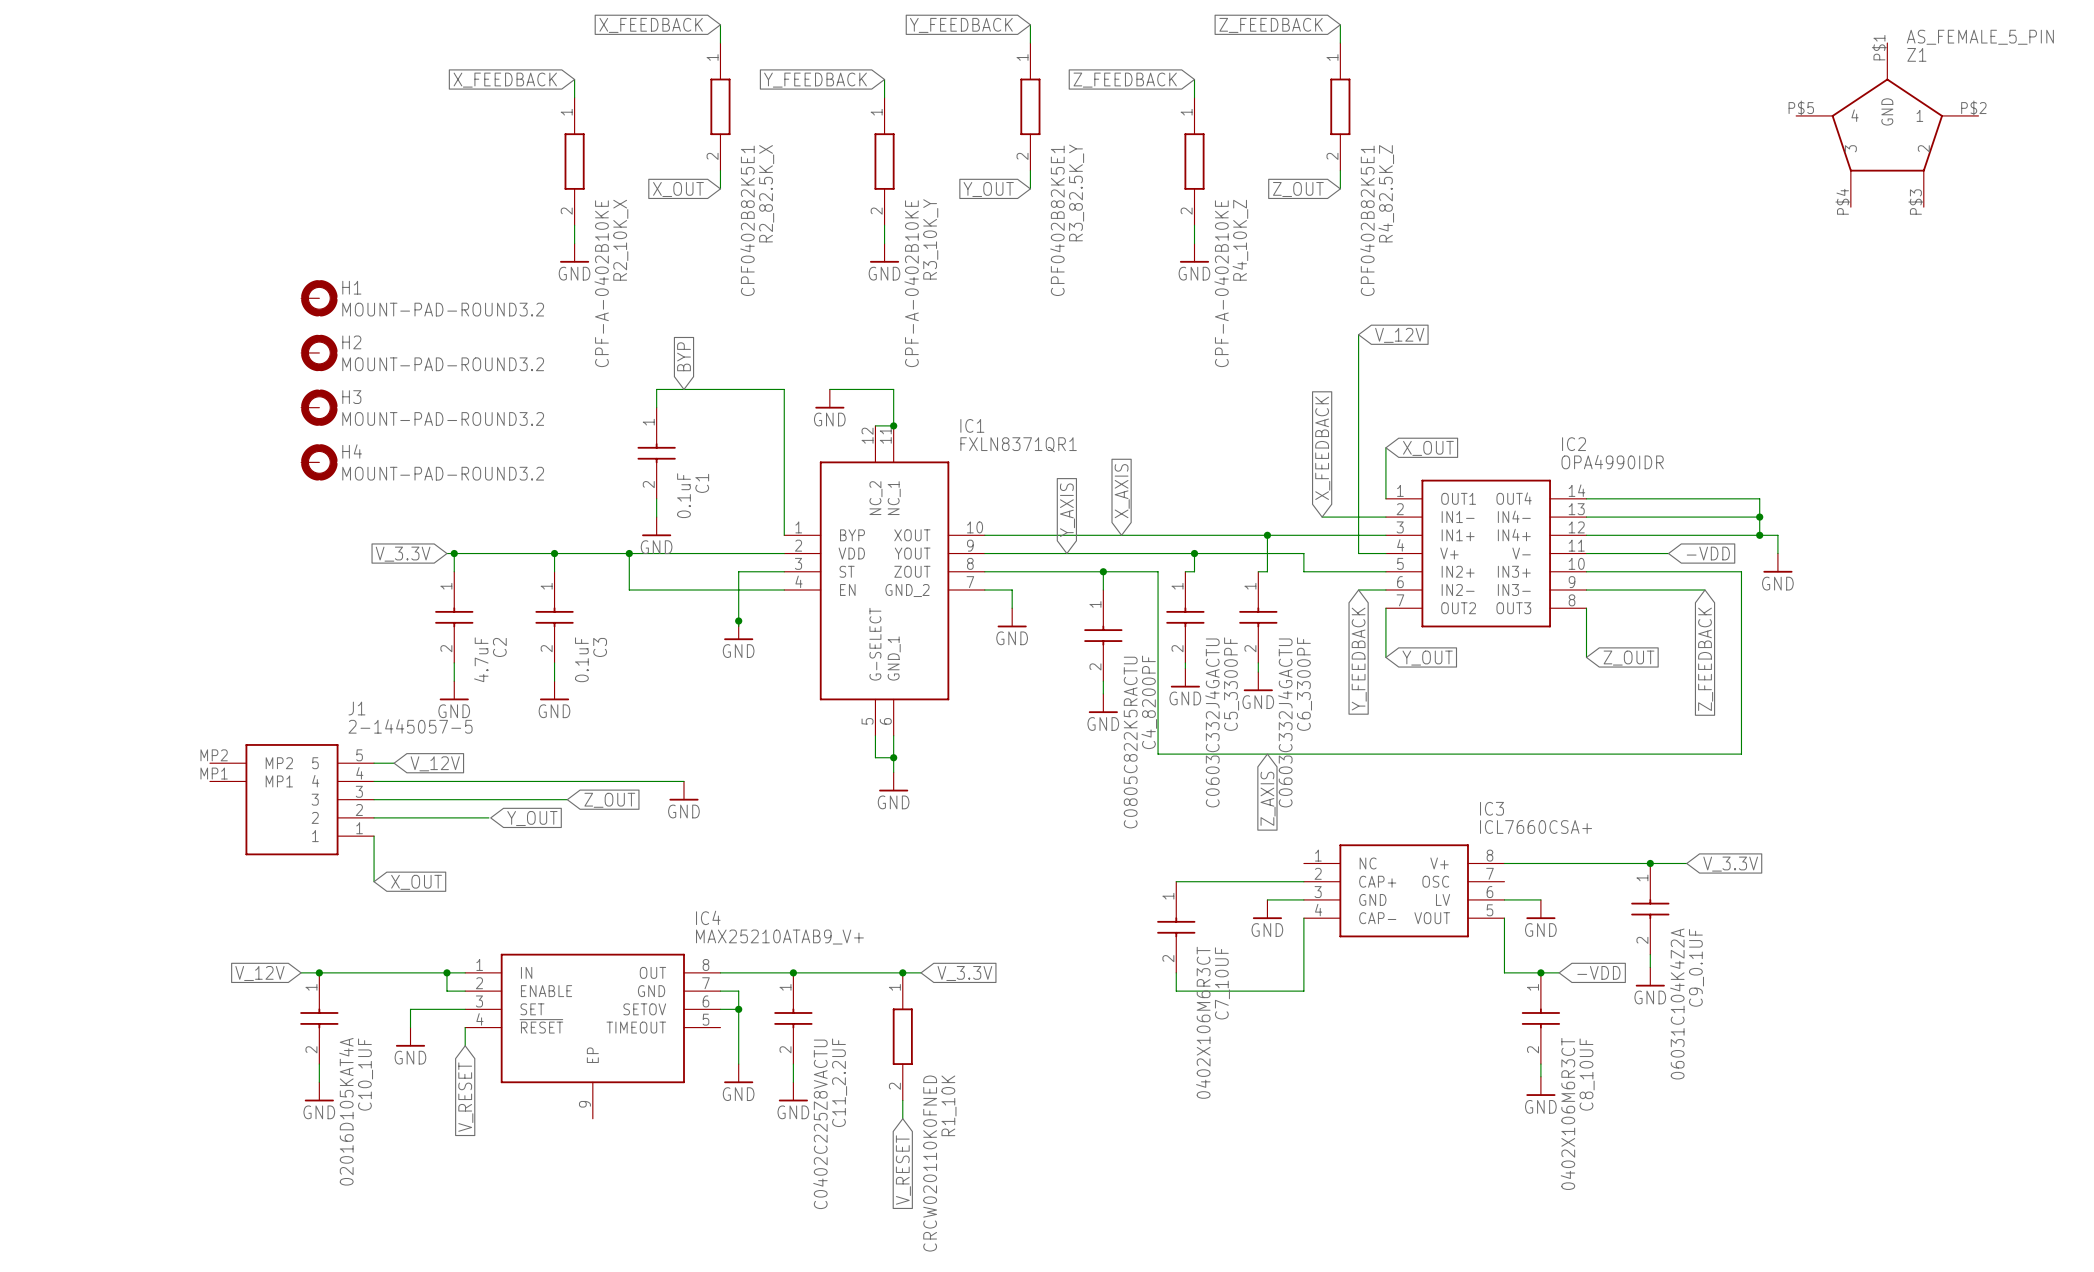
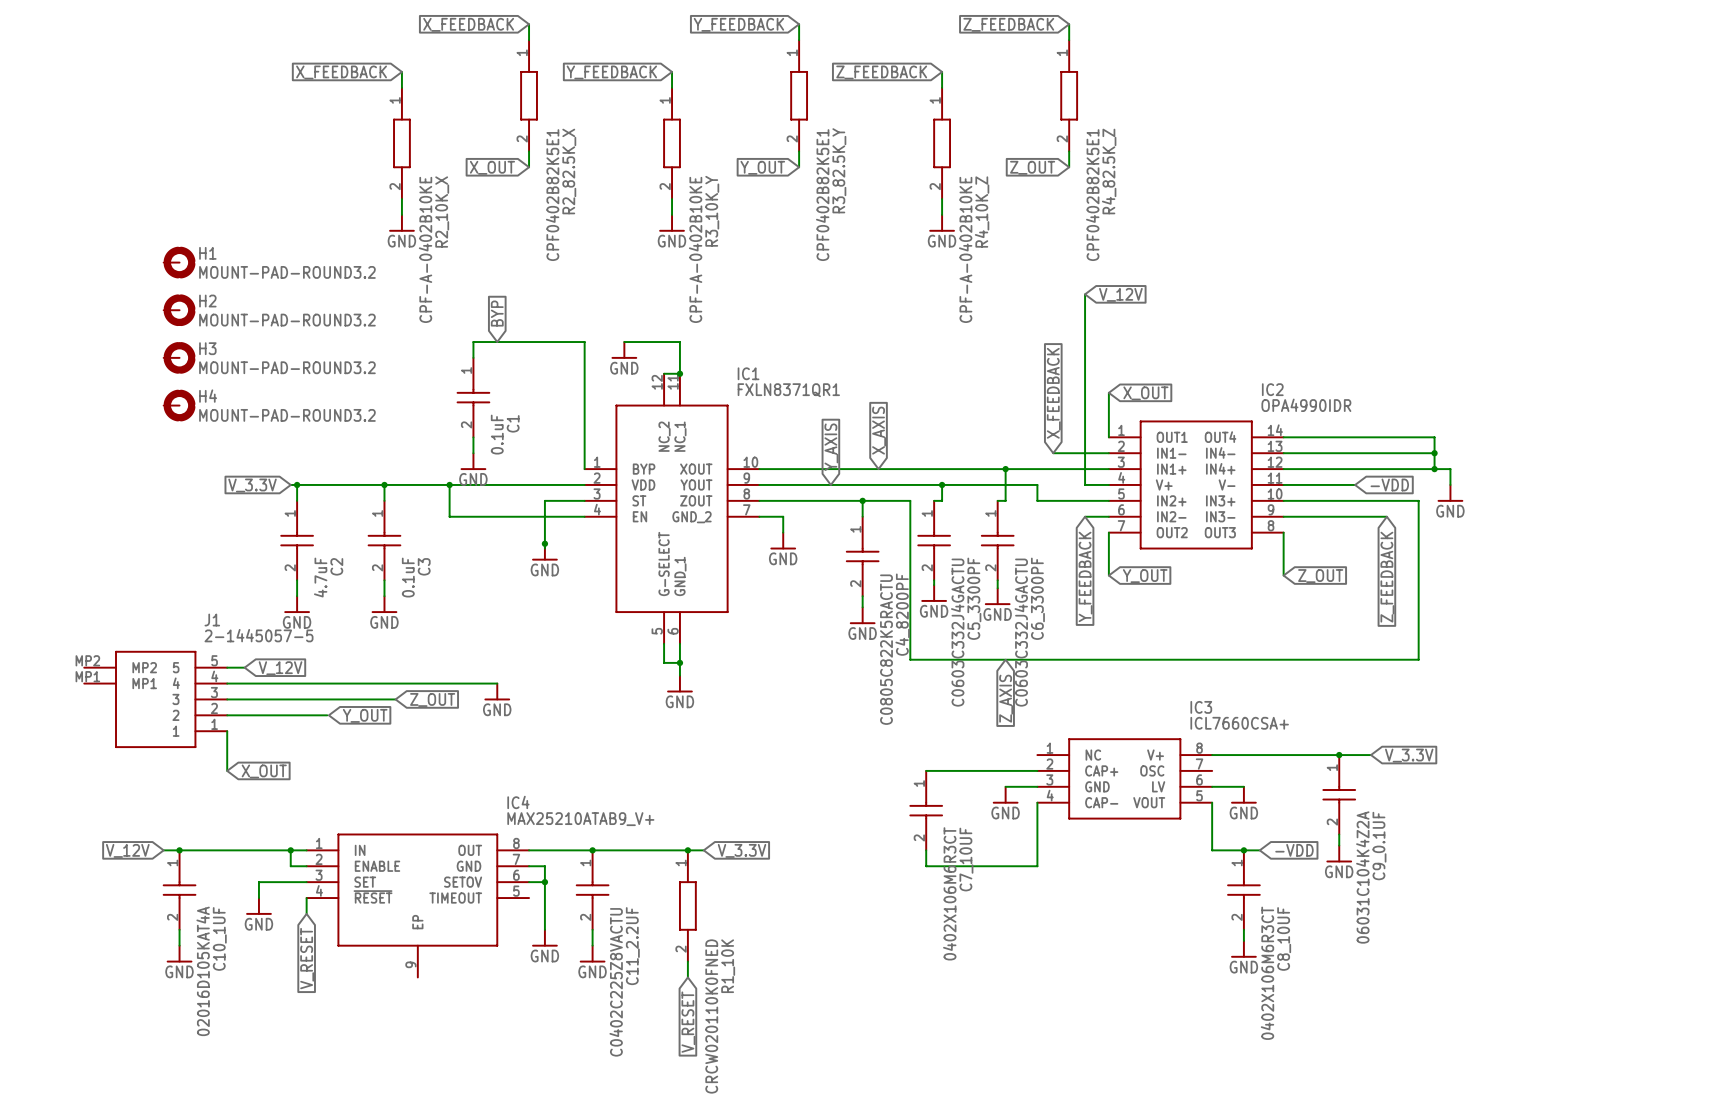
Z1: AS_FEMALE_5_PIN (1887, 125) -> none

